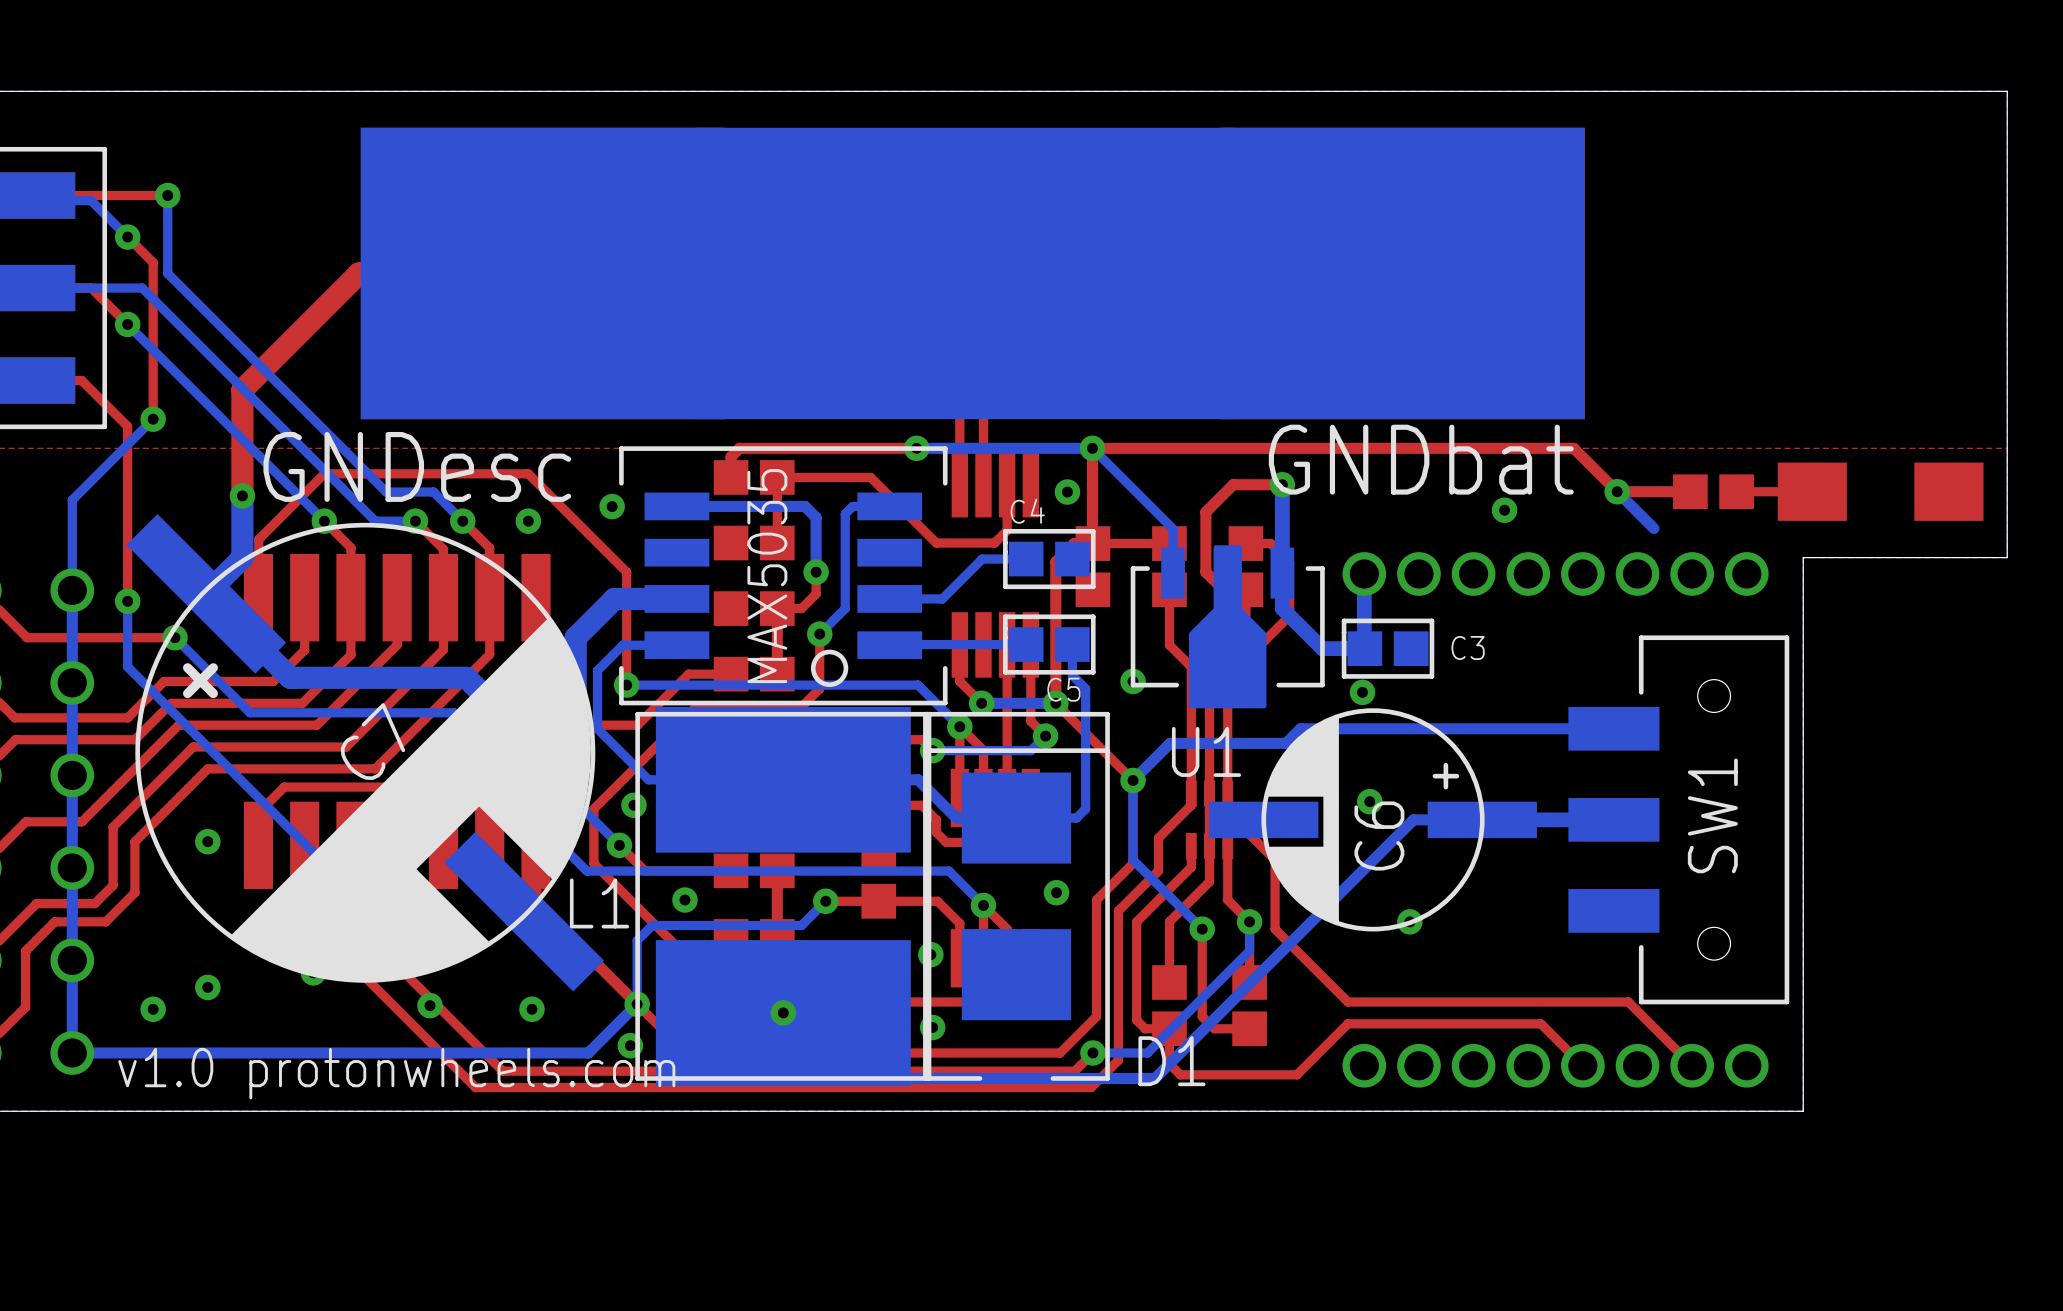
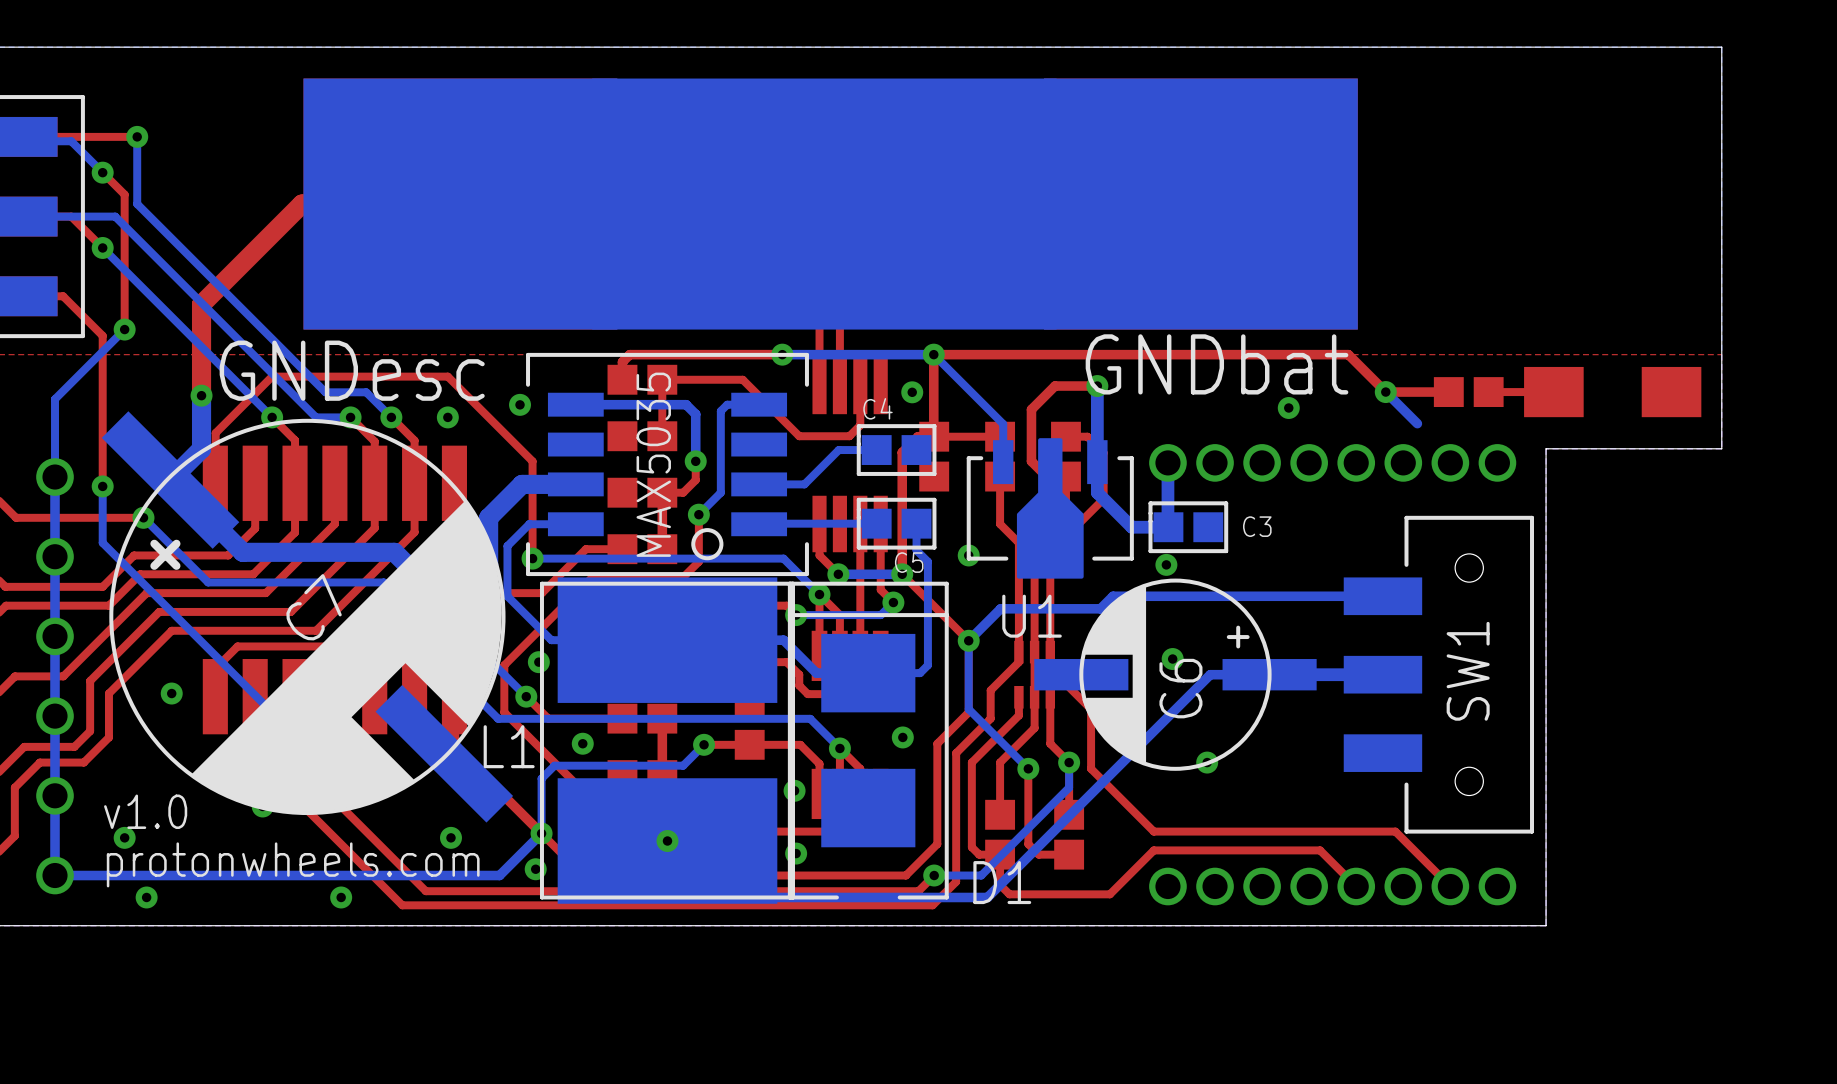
text: none -> v1.0 (145, 811)
via position: (207, 987) -> (146, 897)
via position: (430, 1005) -> (341, 897)
text: v1.0 protonwheels.com (396, 1073) -> protonwheels.com (293, 864)

